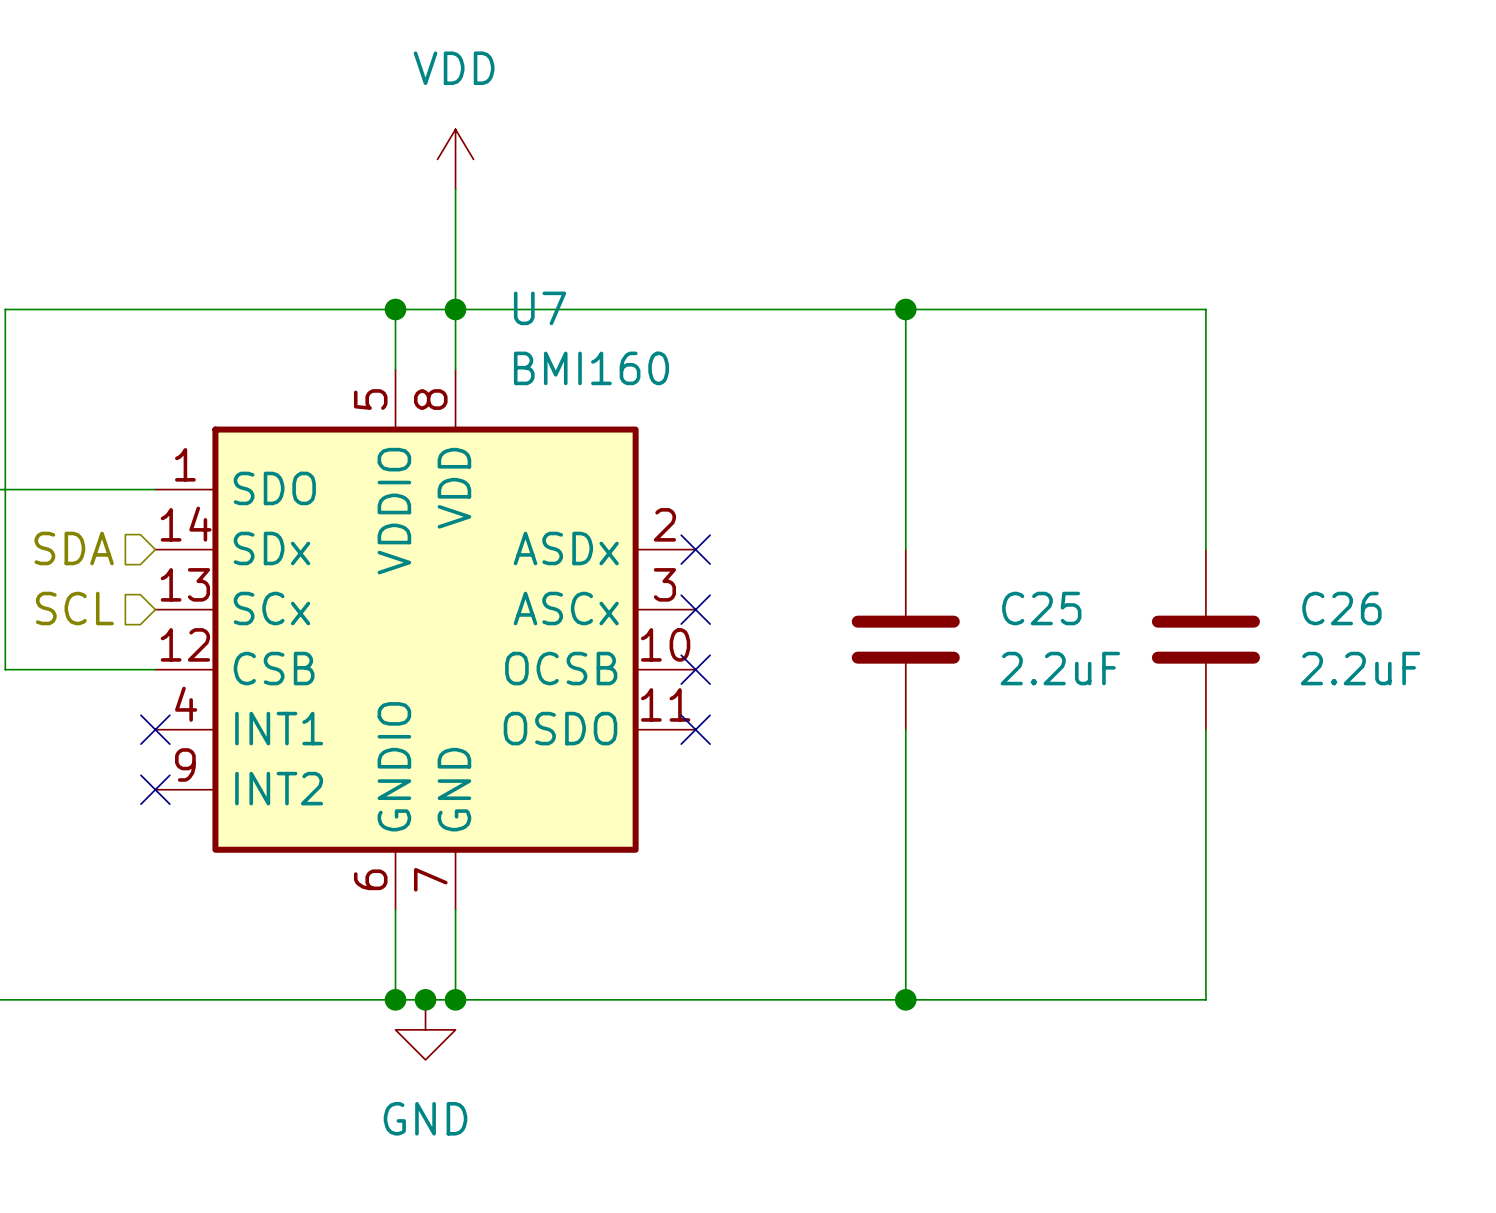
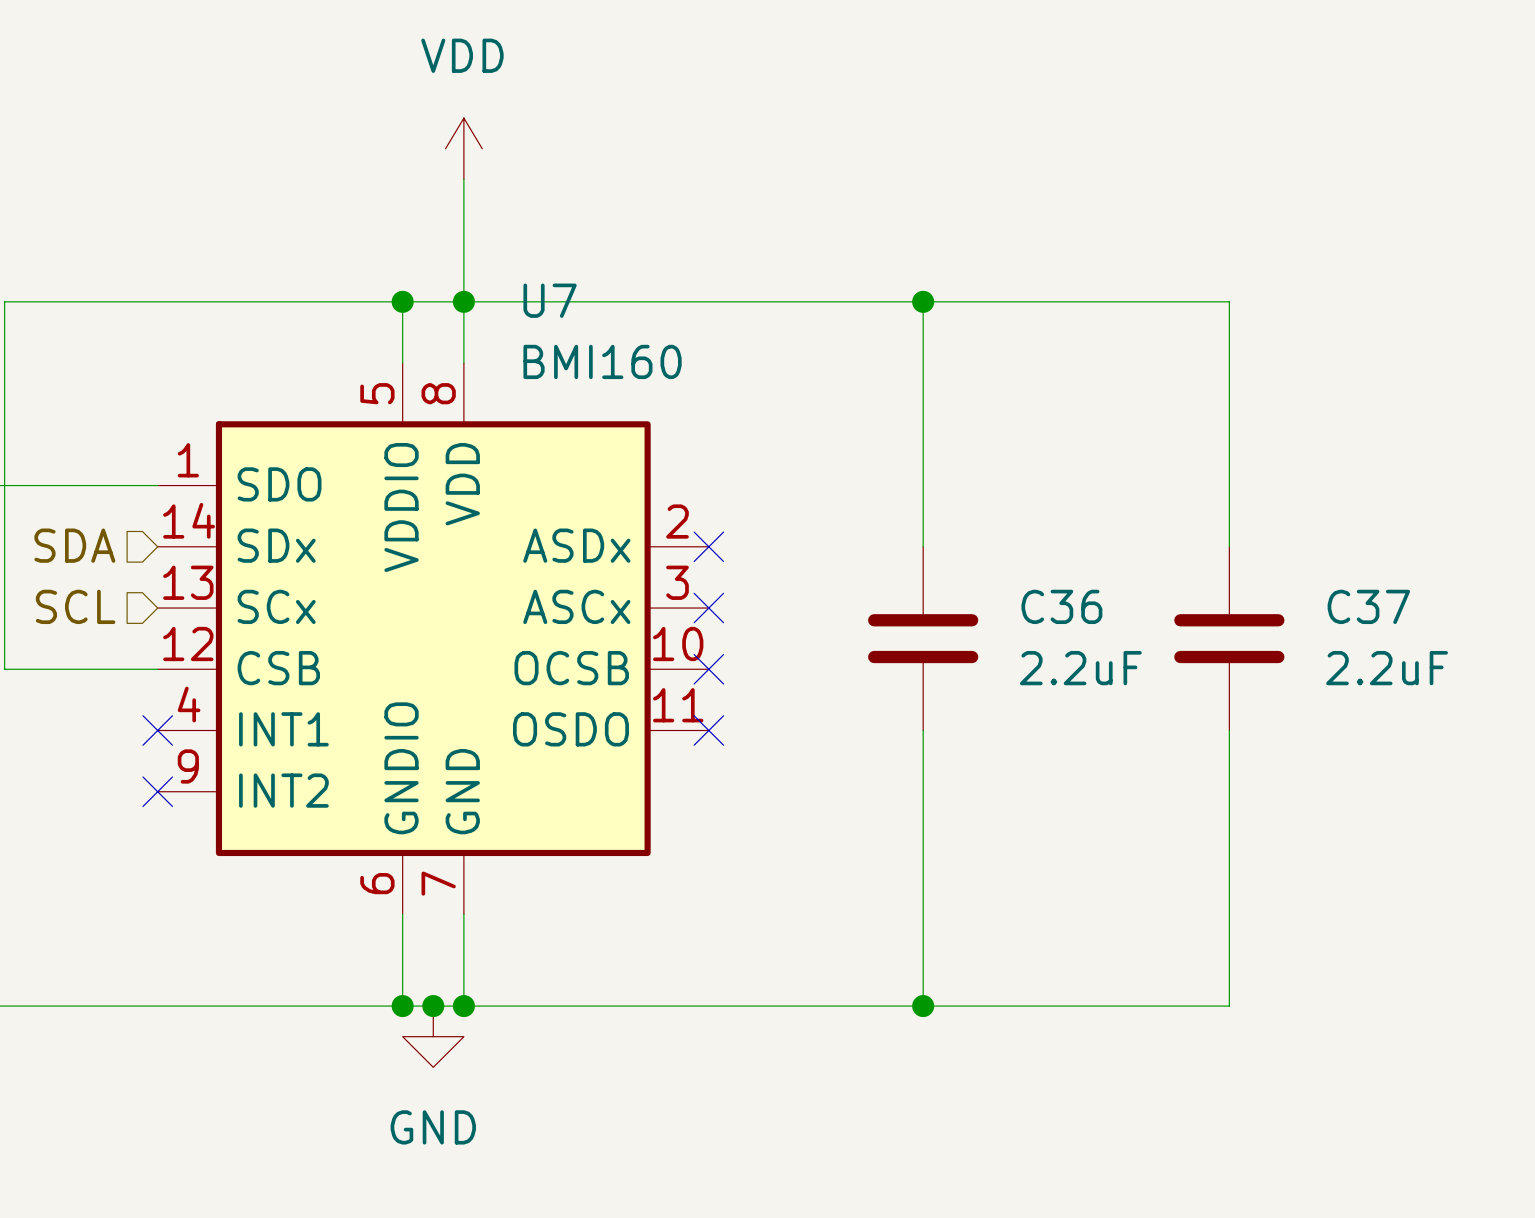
C25 name: C25 (1041, 608) -> C36 (1061, 606)
C26 name: C26 (1341, 608) -> C37 (1368, 606)

